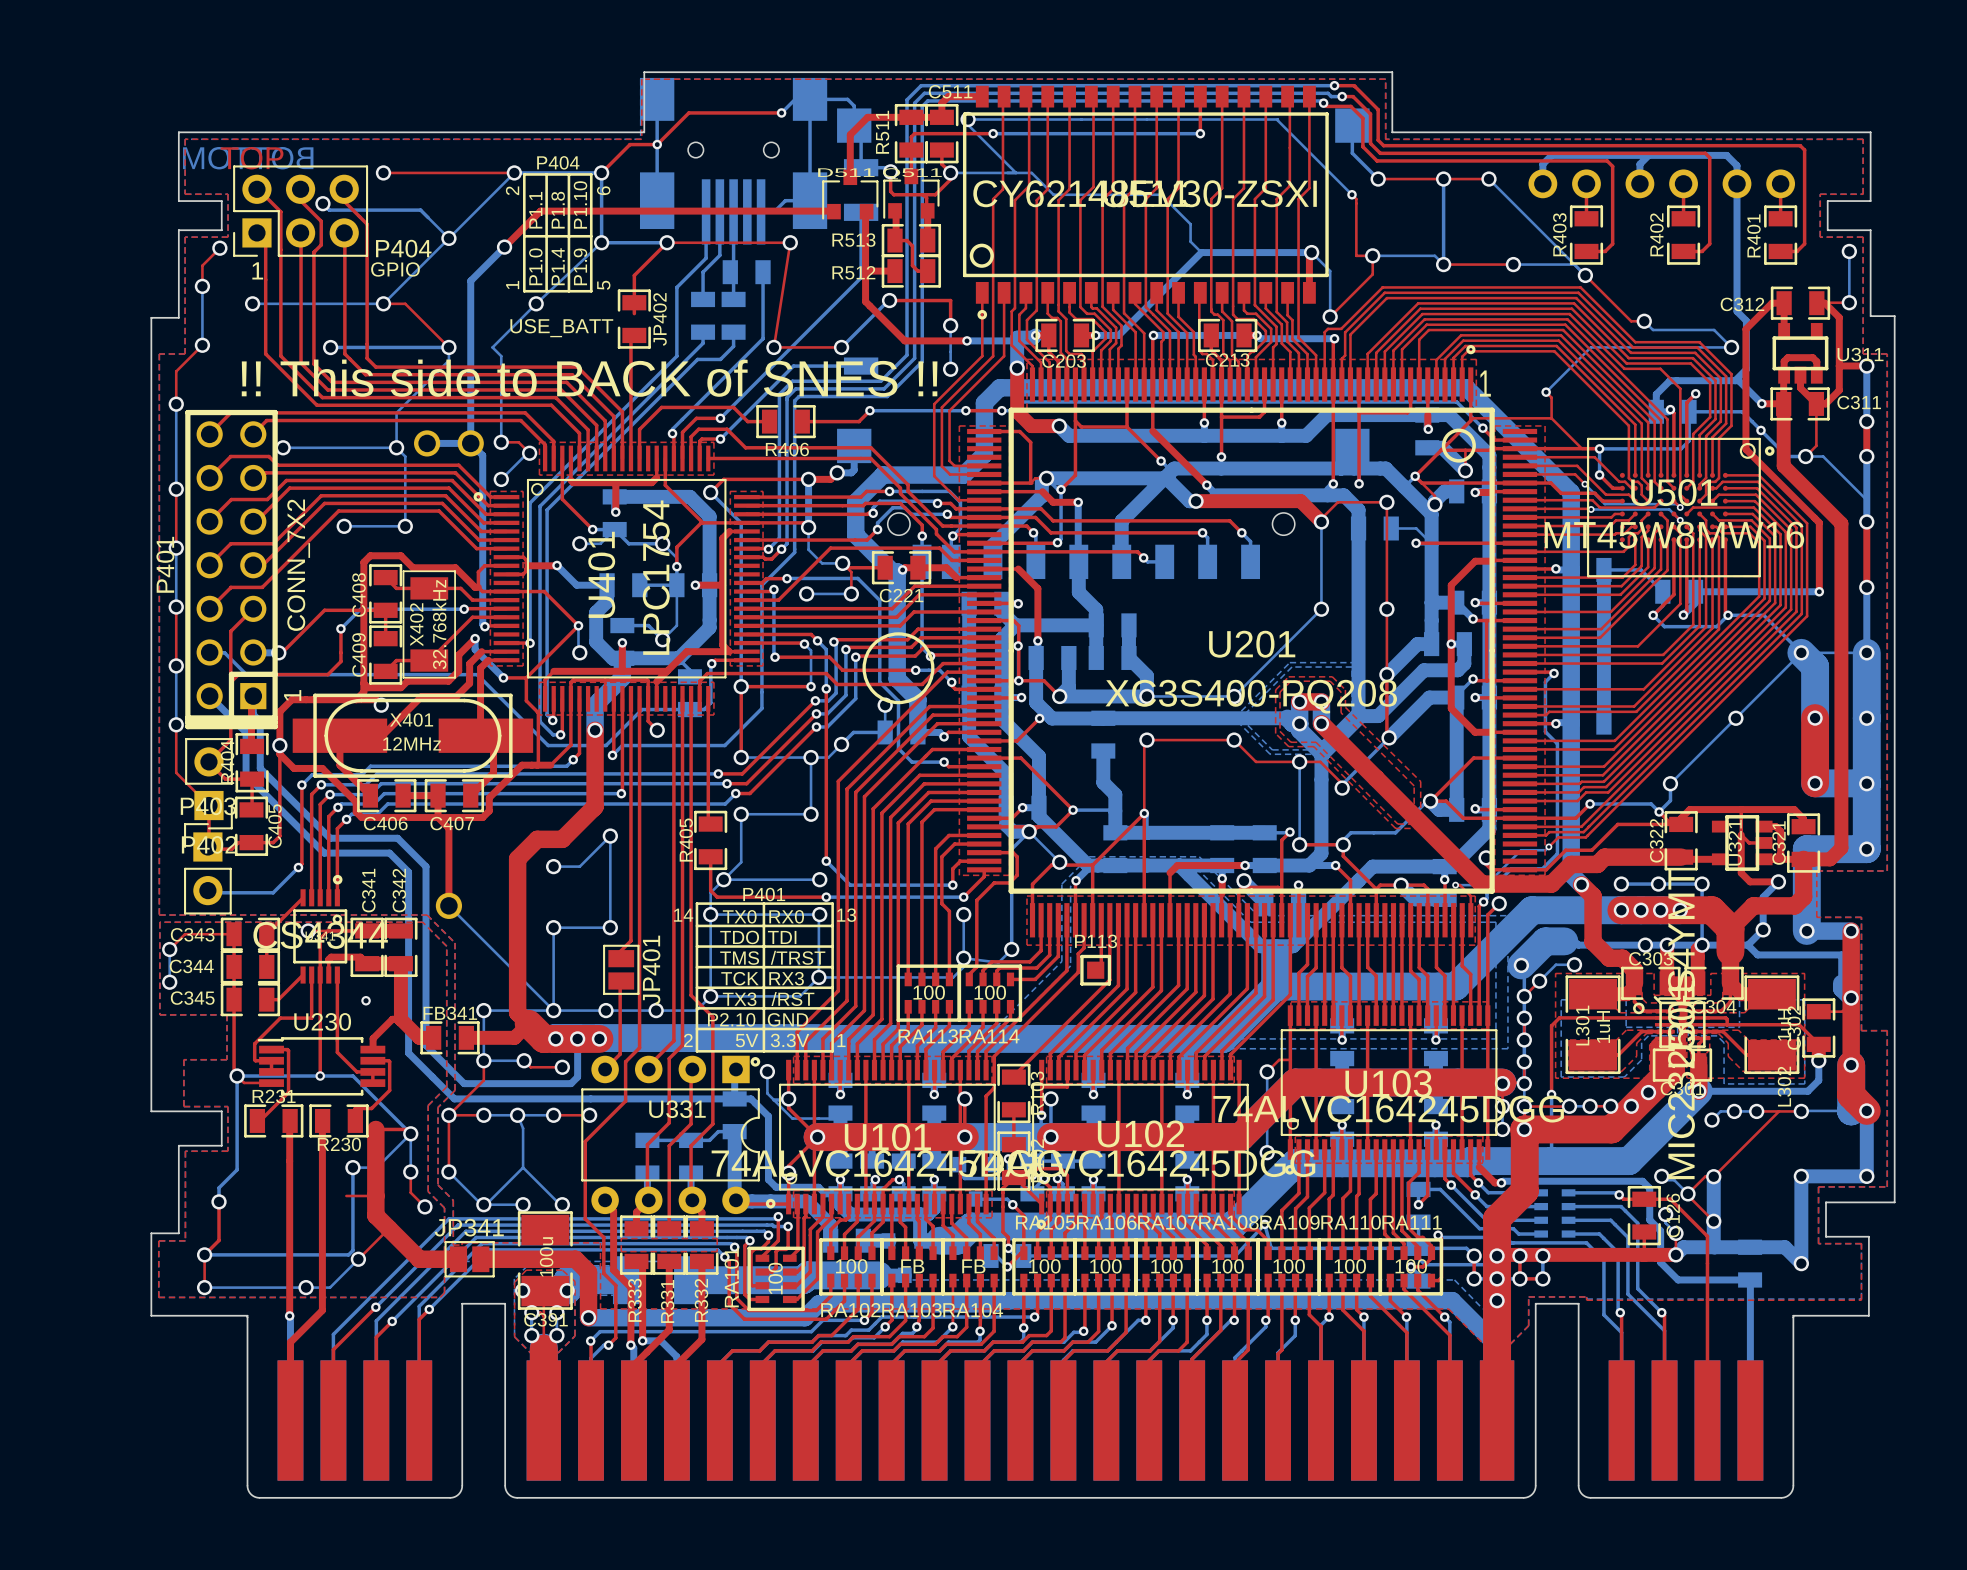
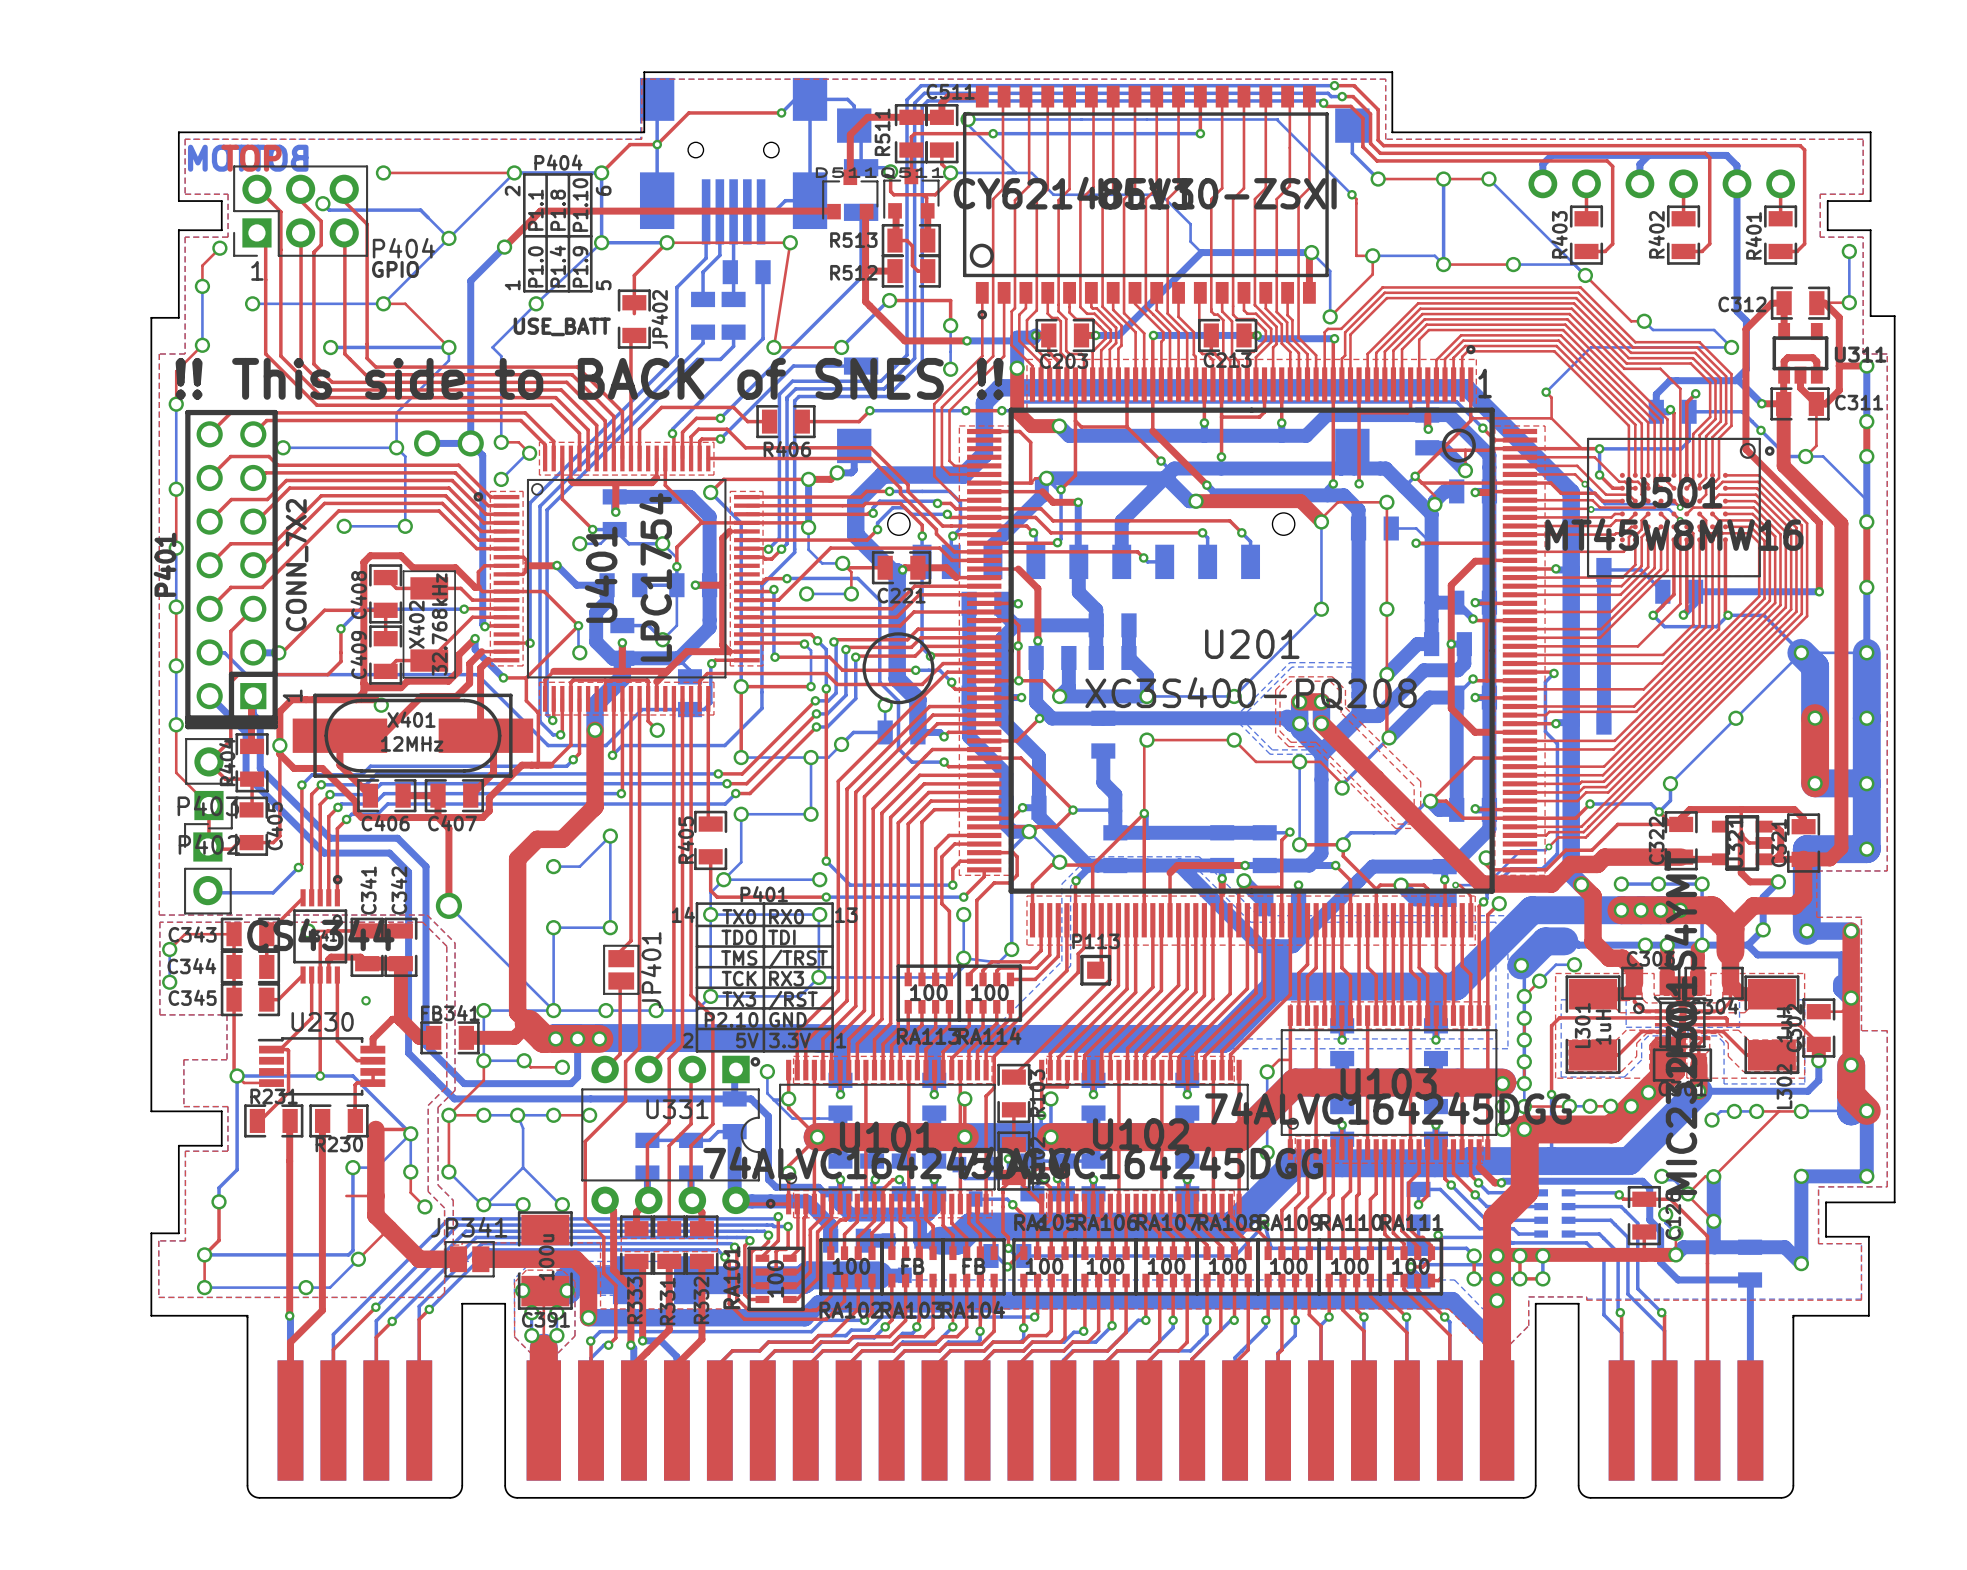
top track: (311, 1018) (280, 1018) (254, 1043) (254, 1059) (271, 1060) (271, 1071) -> (311, 1018) (280, 1049)
top track: (337, 1040) (337, 1052) (356, 1071) (372, 1071) (372, 1083) -> (337, 1040) (357, 1060) (373, 1060)
top track: (372, 1060) (389, 1061) (389, 1090) (371, 1108) (355, 1108) -> (373, 1071) (373, 1082) (357, 1082) (355, 1084) (355, 1108)

